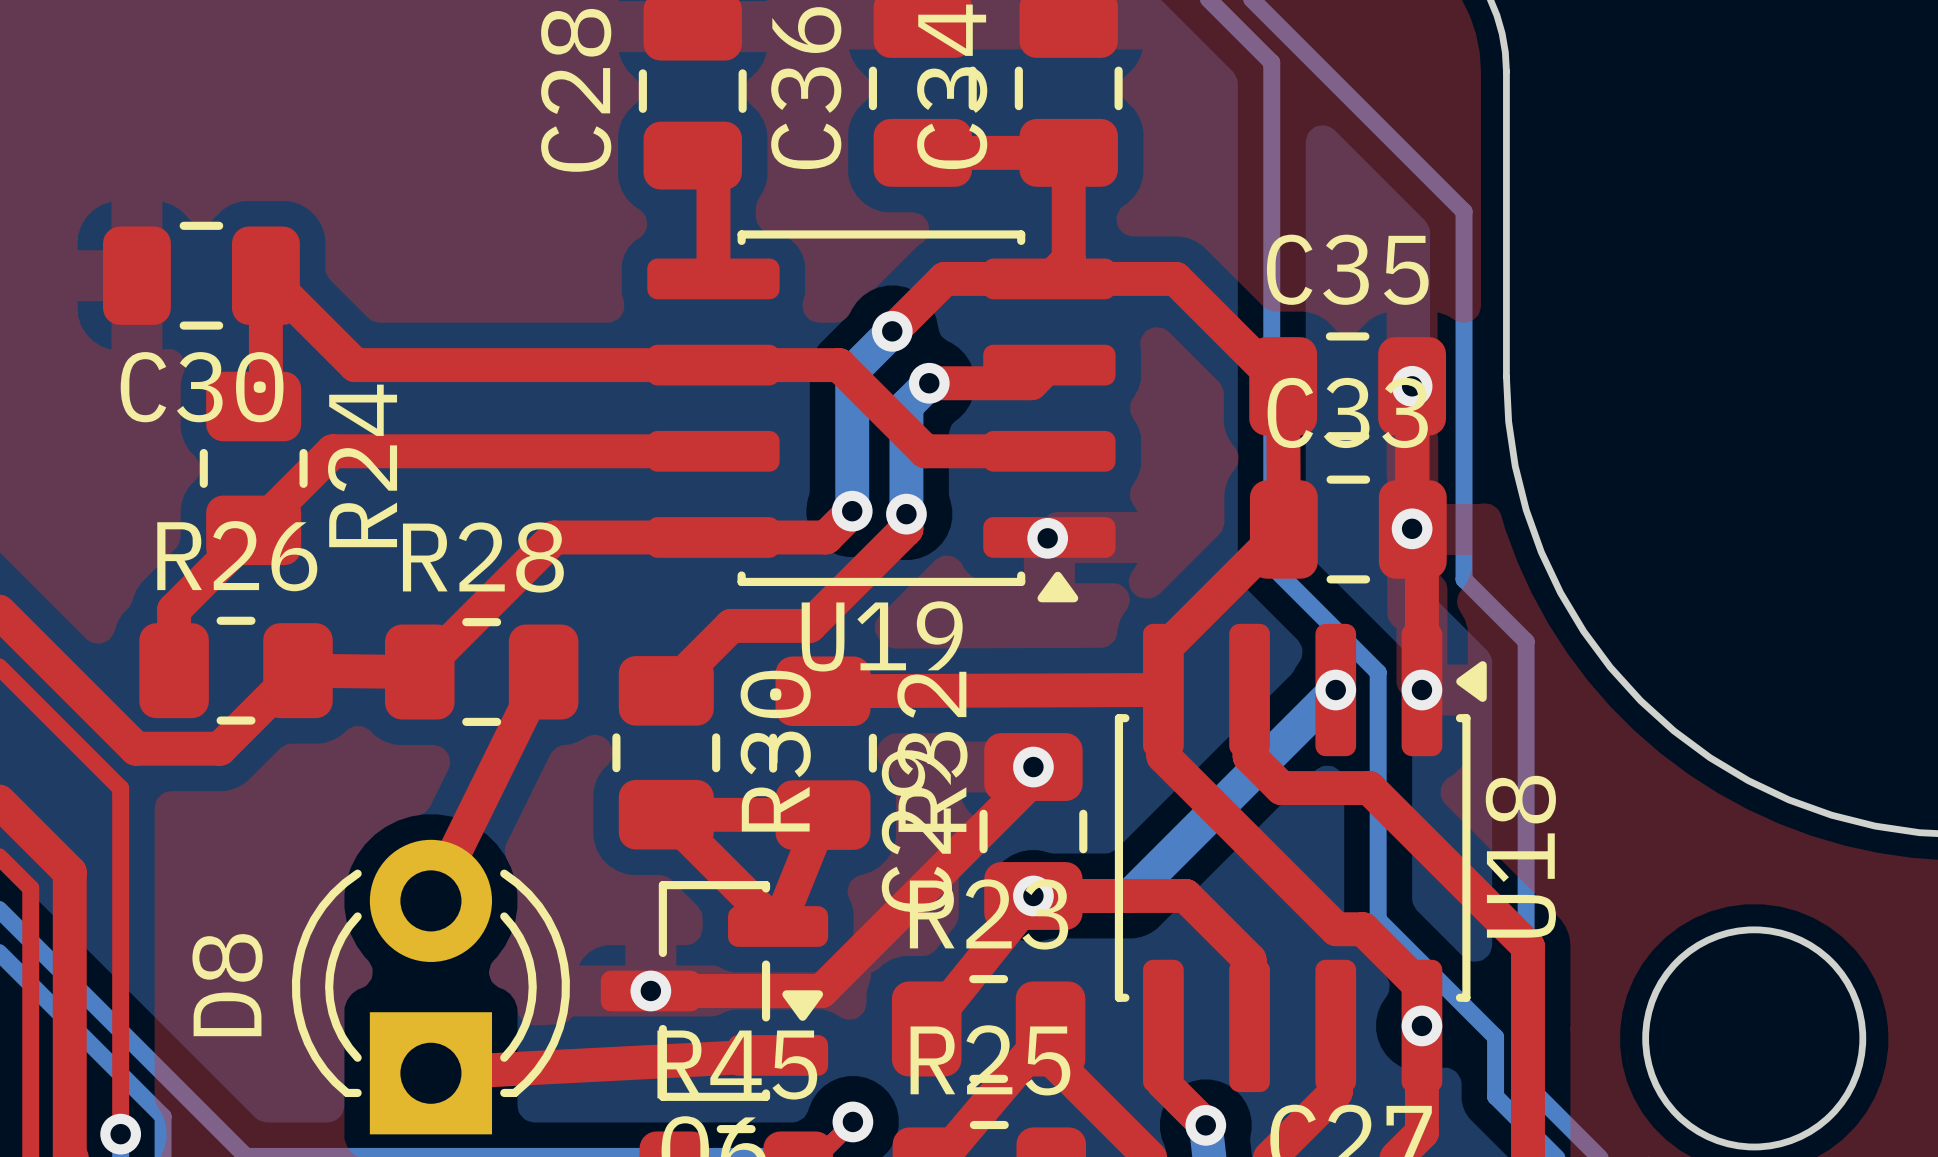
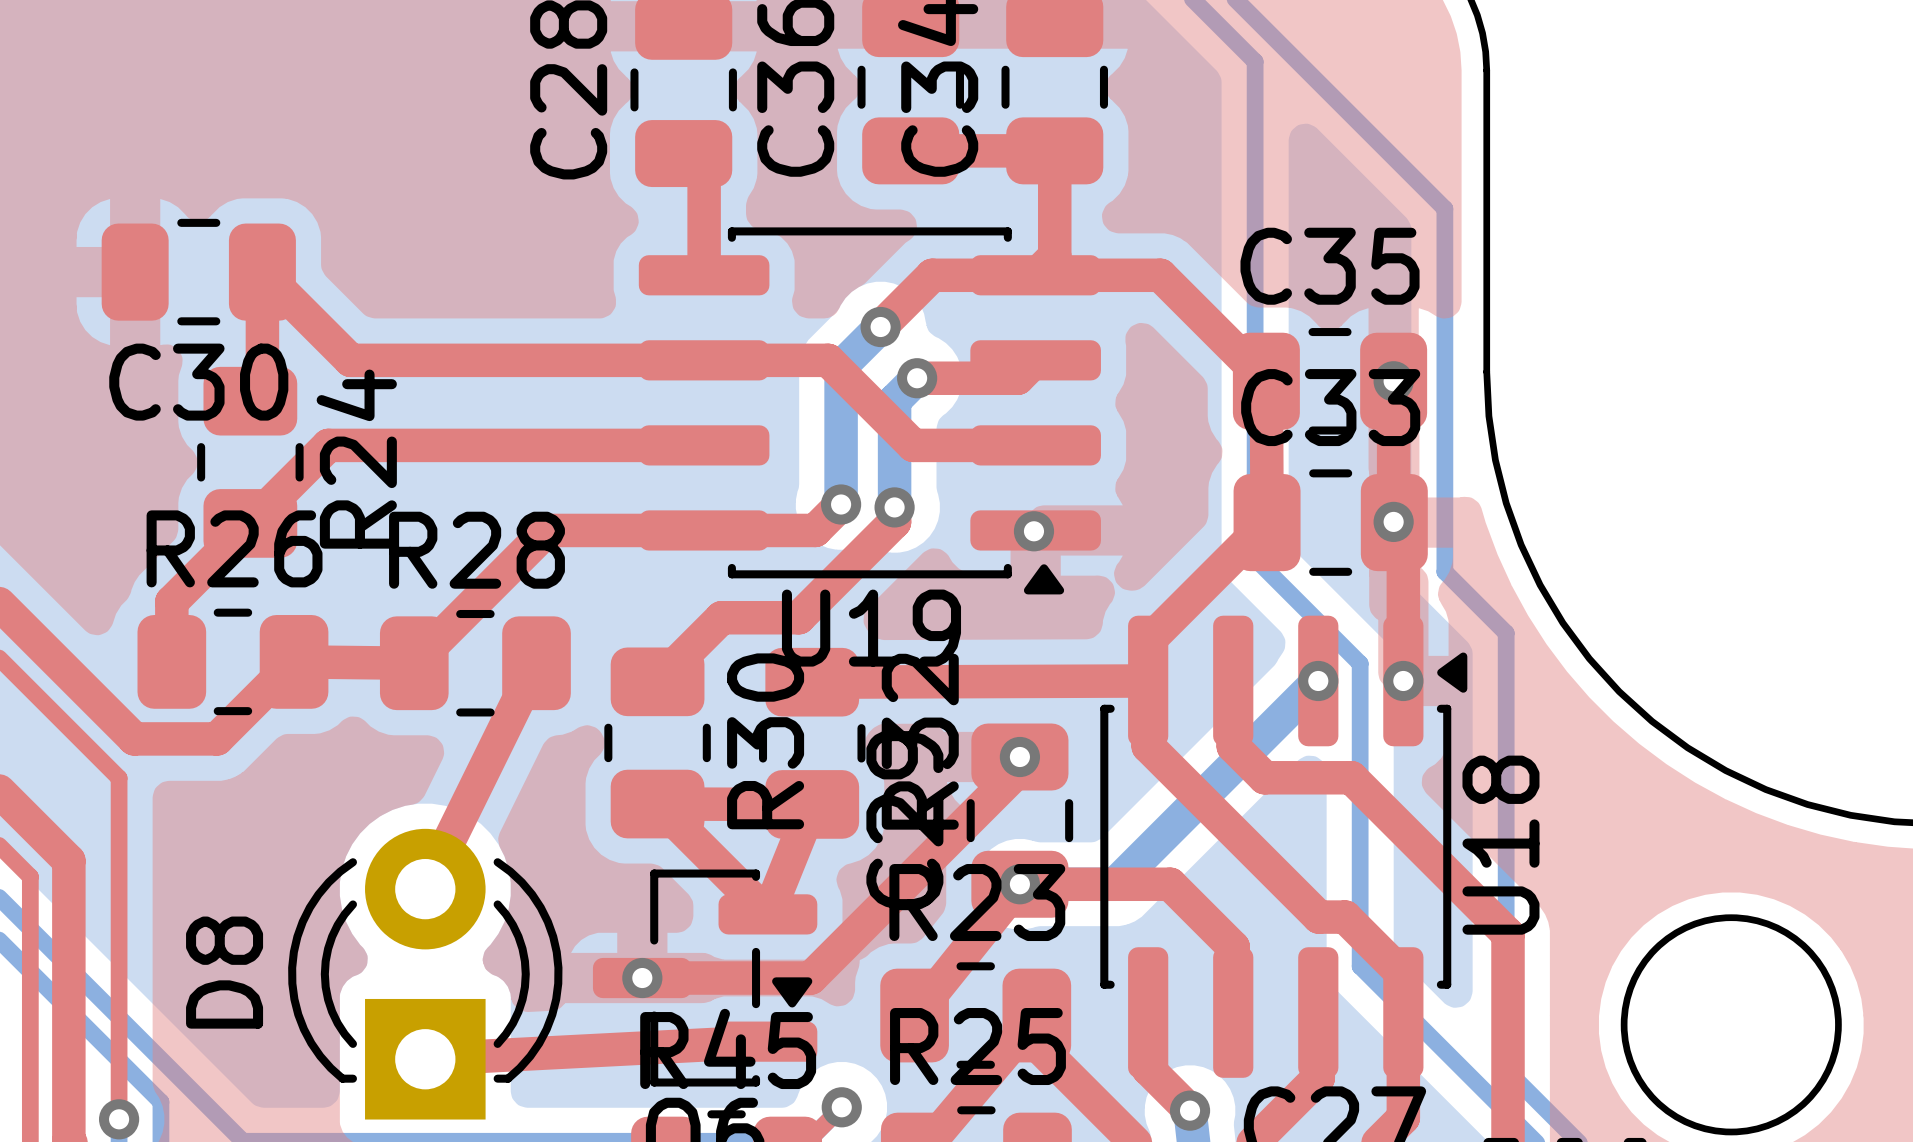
bottom track: (1378, 919) (1495, 1037) (1495, 1096) -> (1360, 907) (1360, 966) (1476, 1082)
via: (1421, 1025) -> none

